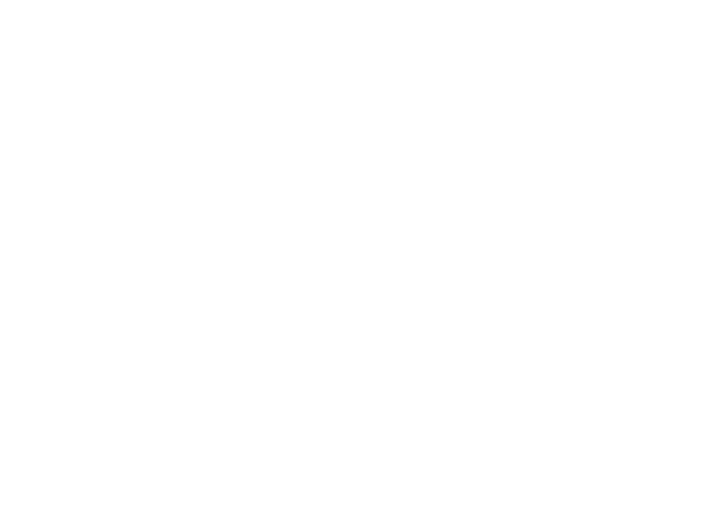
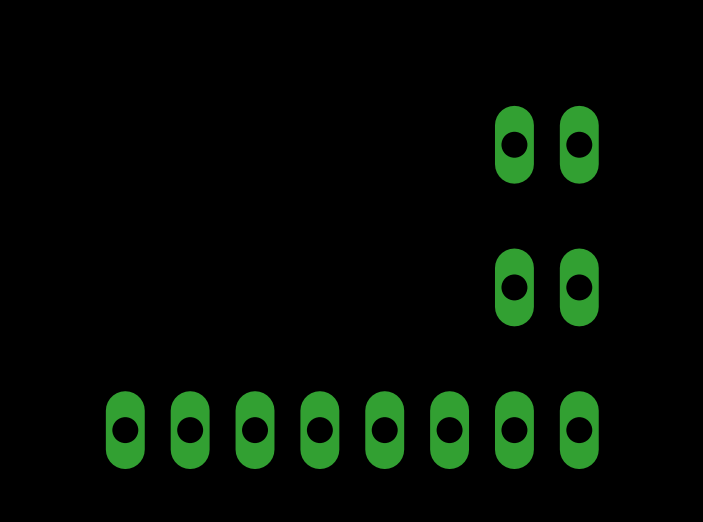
part: none -> (546, 144)
part: none -> (546, 287)
part: none -> (352, 430)

